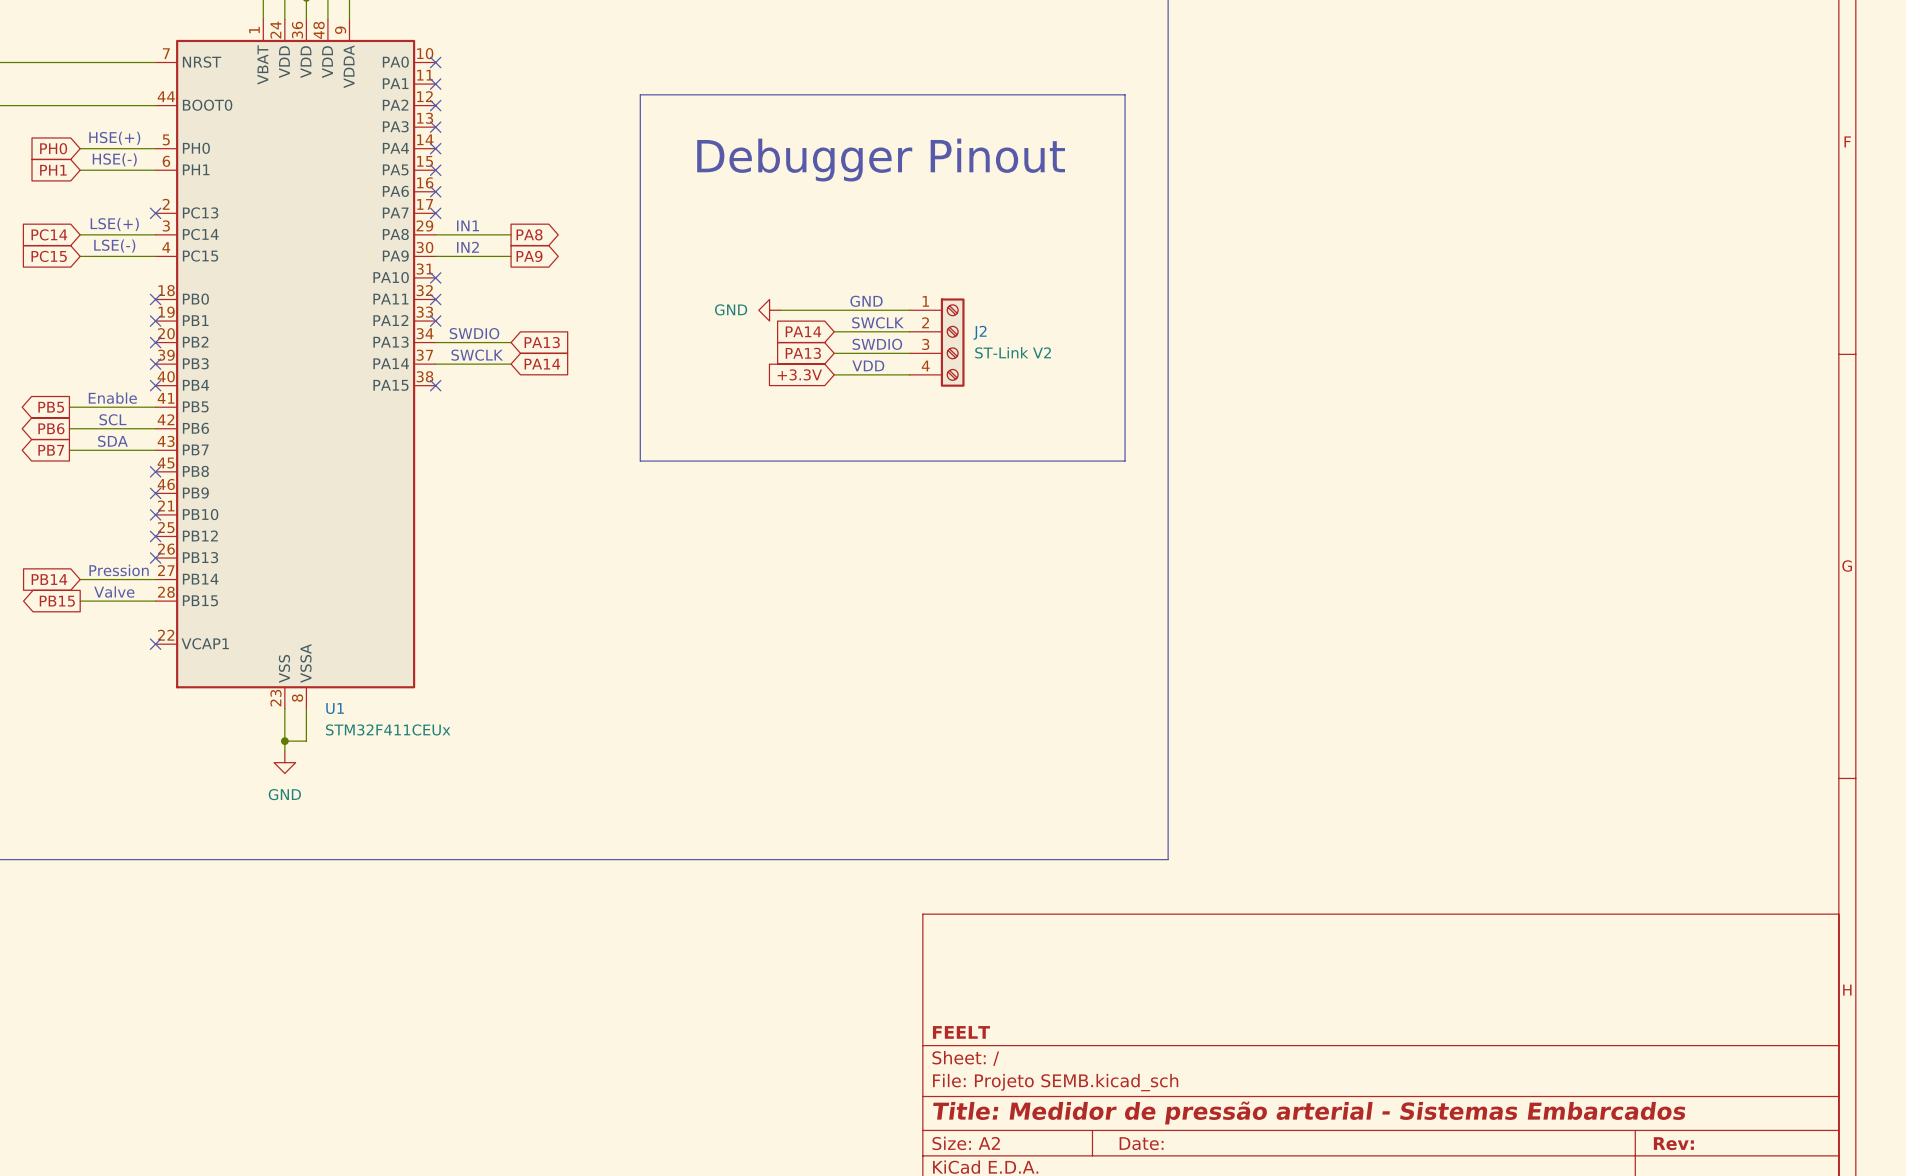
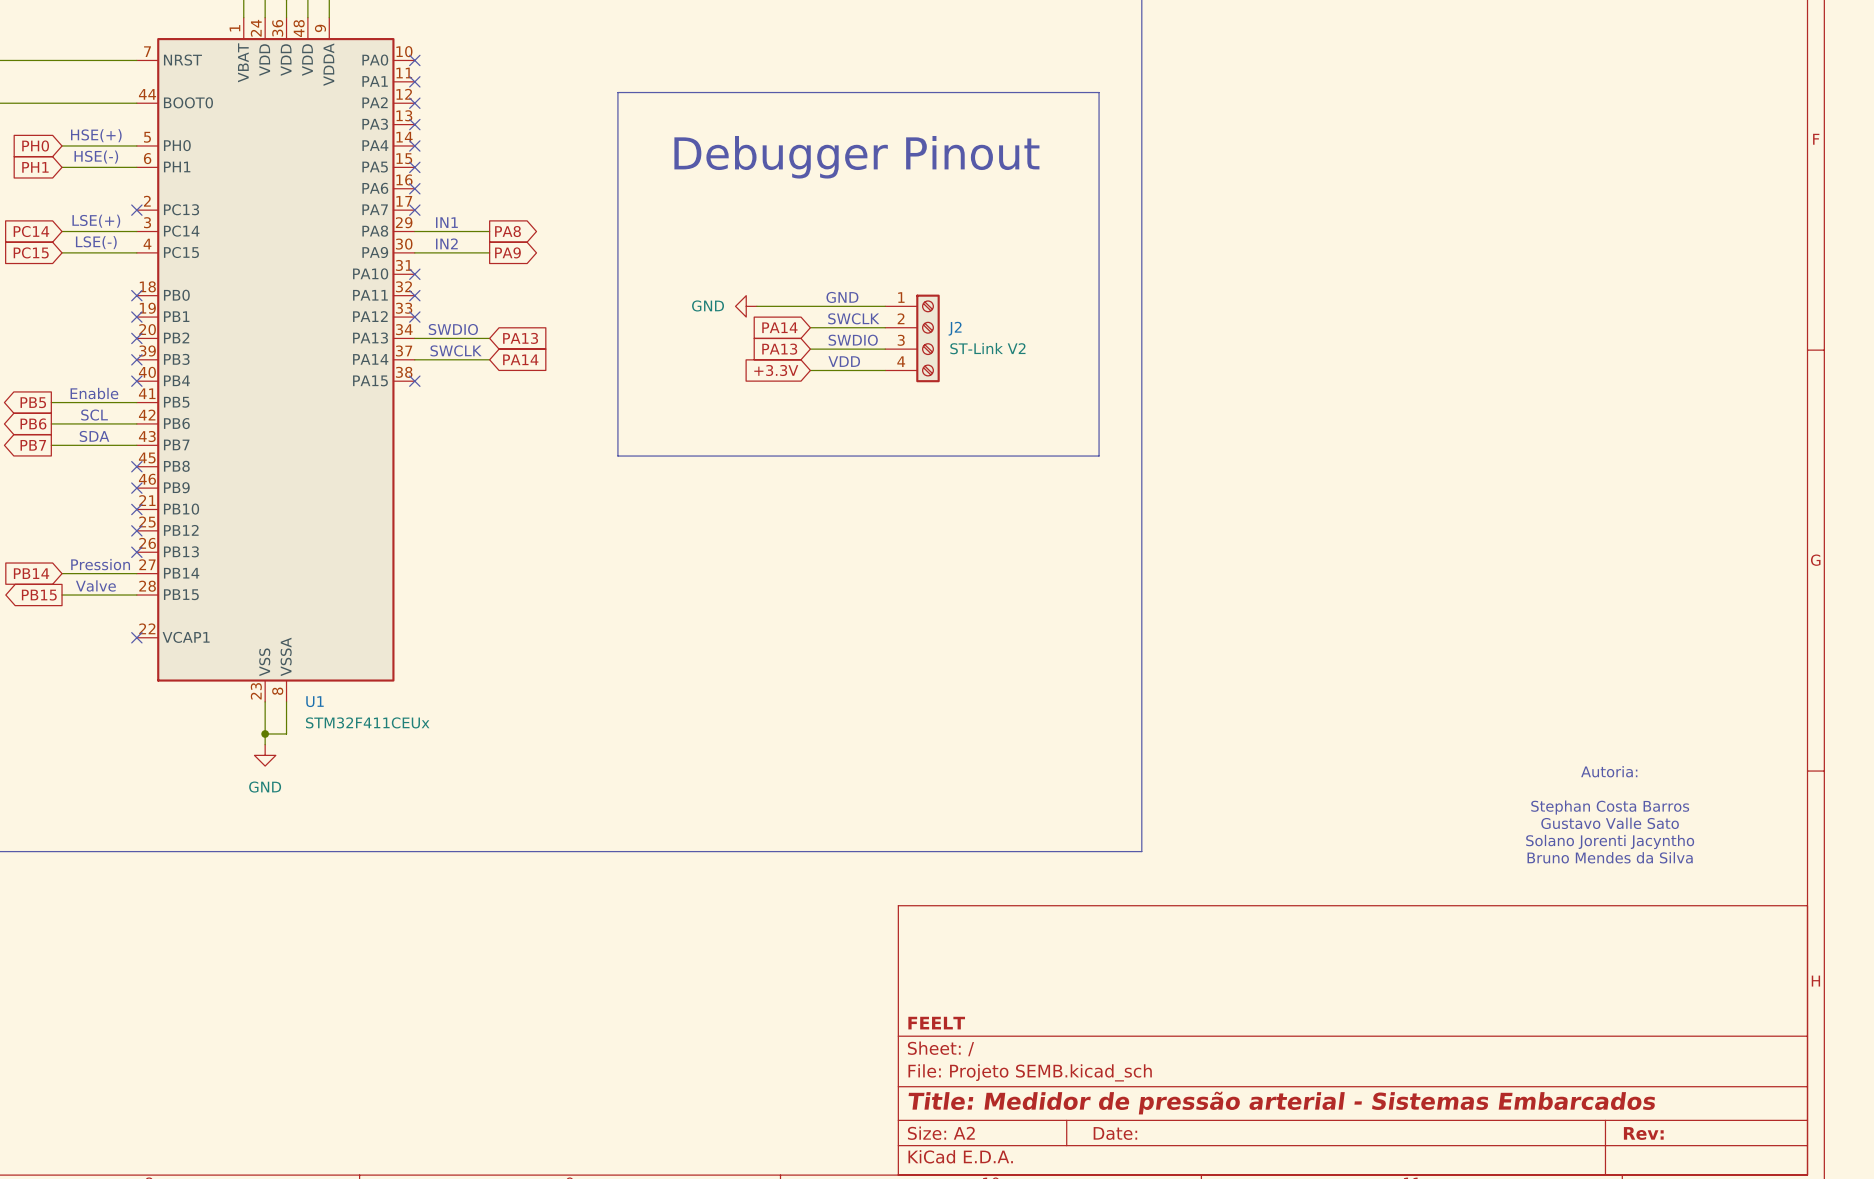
text: none -> Autoria: (1609, 771)
text: none -> Stephan Costa Barros (1610, 807)
text: none -> Gustavo Valle Sato (1610, 823)
text: none -> Solano Jorenti Jacyntho (1610, 841)
text: none -> Bruno Mendes da Silva (1610, 857)

